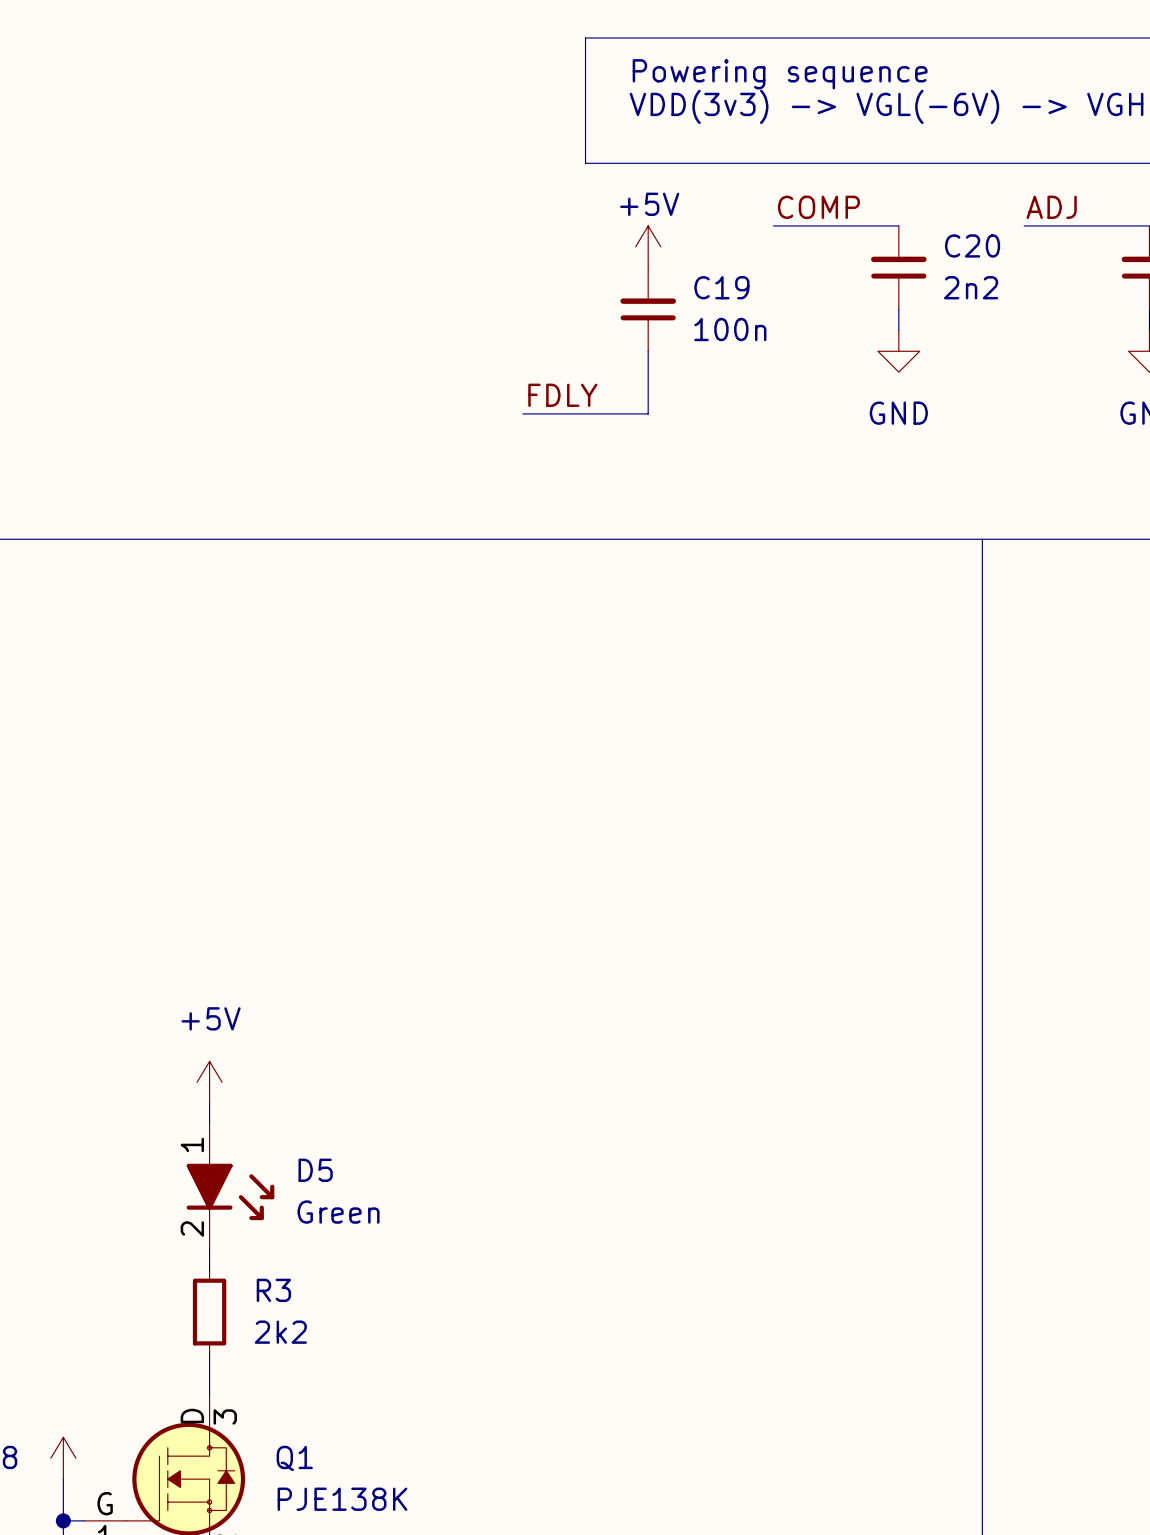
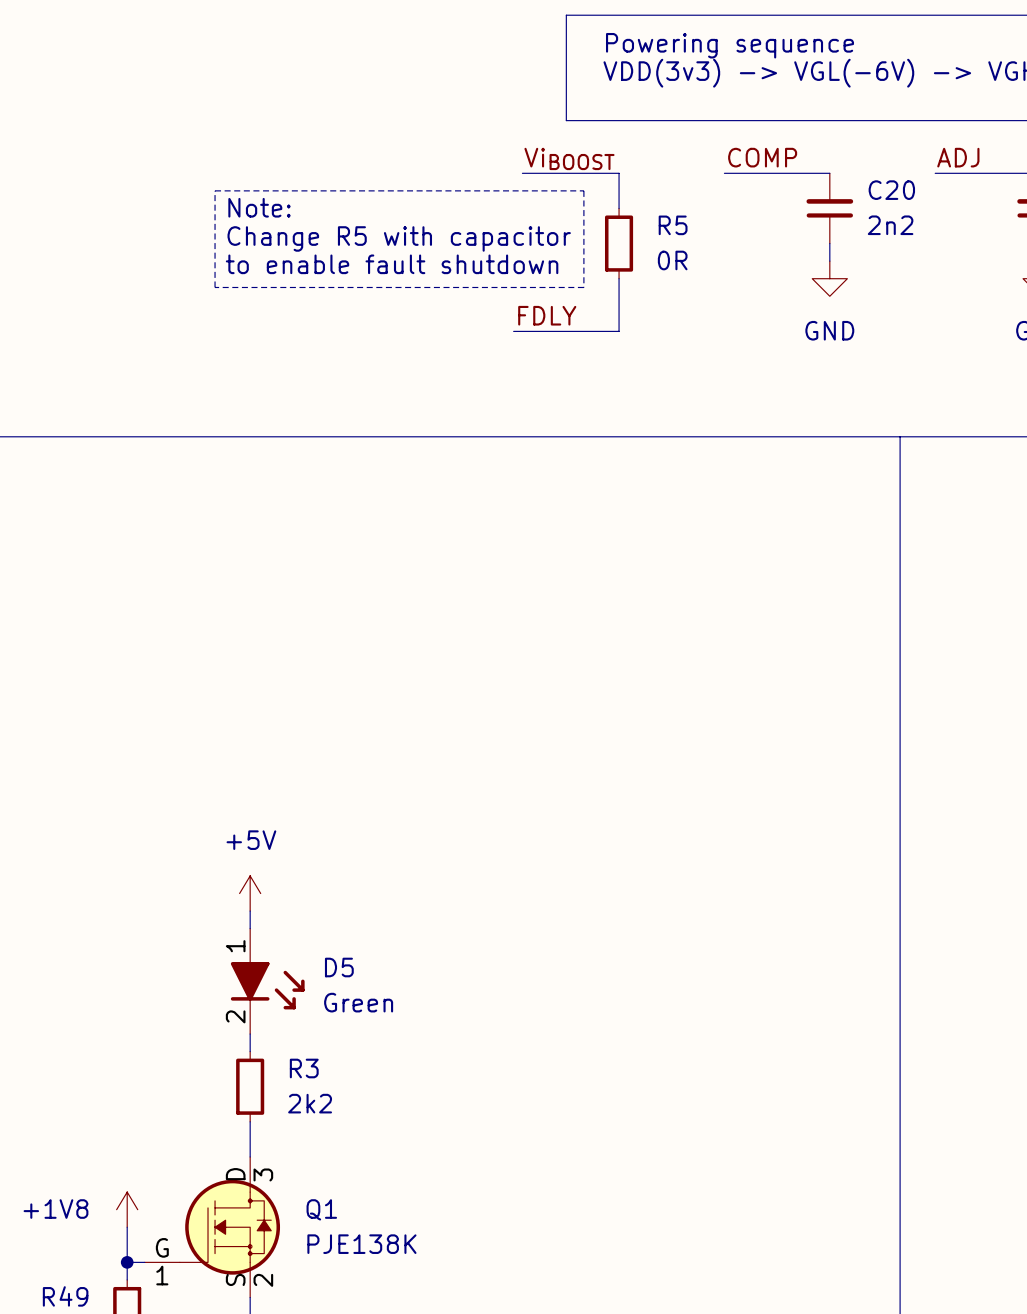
label: none -> ViBOOST (569, 158)
wire: none -> (522, 173) (619, 173) (619, 208)
line: none -> (215, 190) (583, 190) (583, 287) (215, 287) (215, 190)
power symbol: +5V (648, 246) -> none
text: none -> Note: (259, 207)
text: none -> Change R5 with capacitor (399, 238)
C19: (648, 309) -> none
R5: none -> (619, 243)
text: none -> to enable fault shutdown (392, 264)

